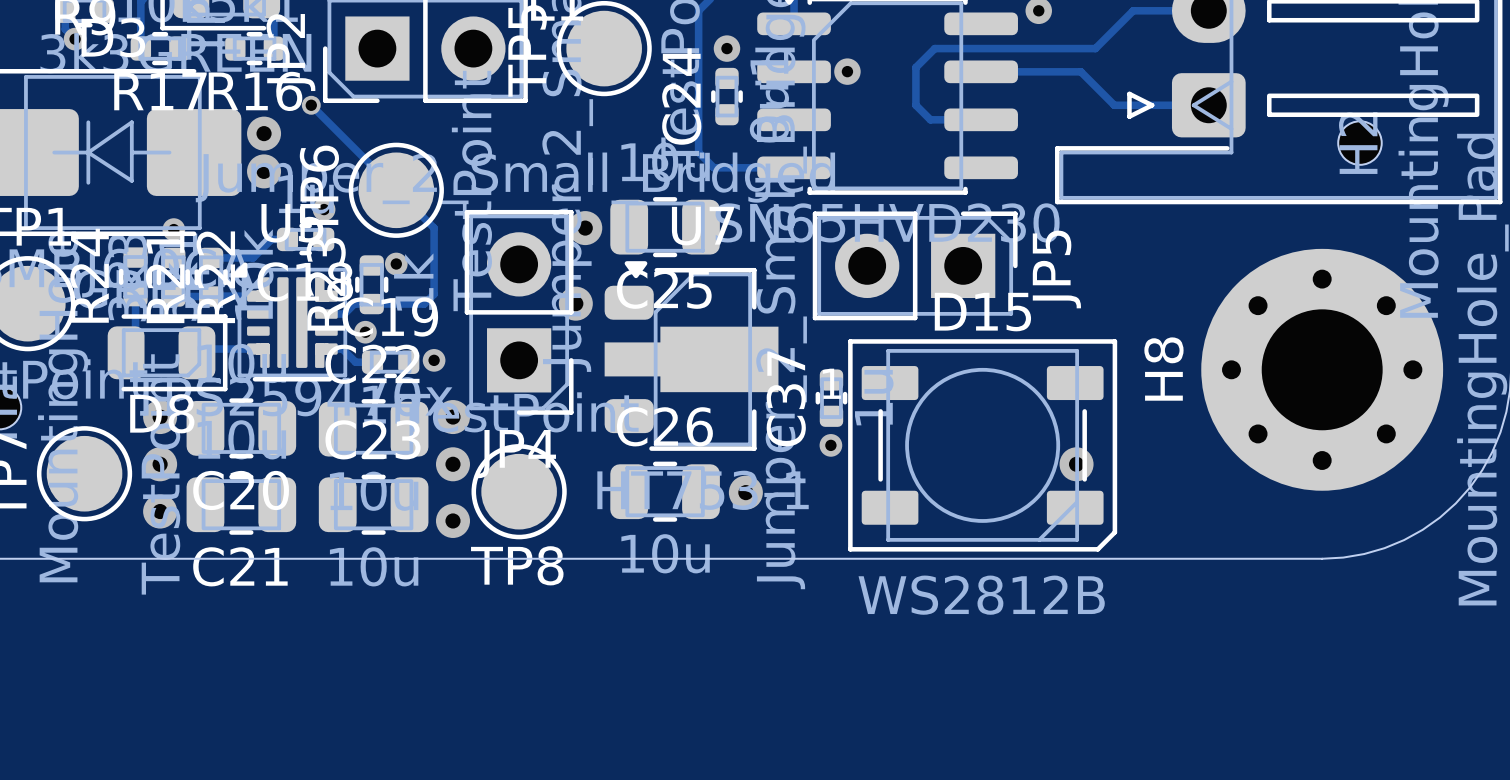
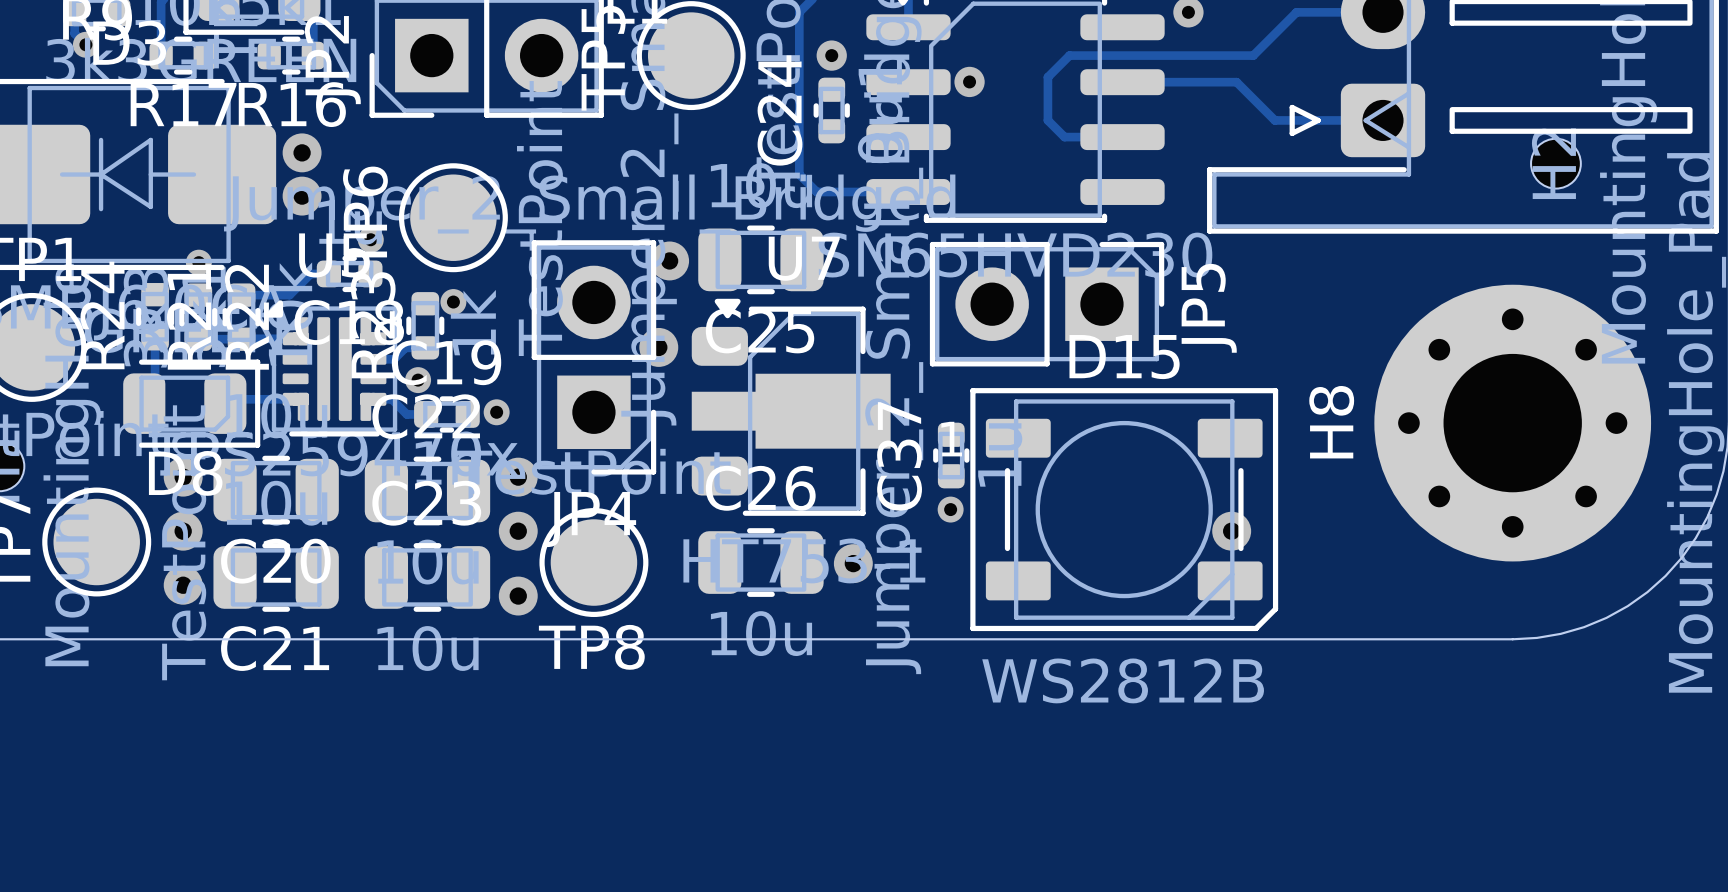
track: (311, 105) (434, 228) (434, 294) (424, 304) (371, 304) -> none
via: (311, 105) -> none

